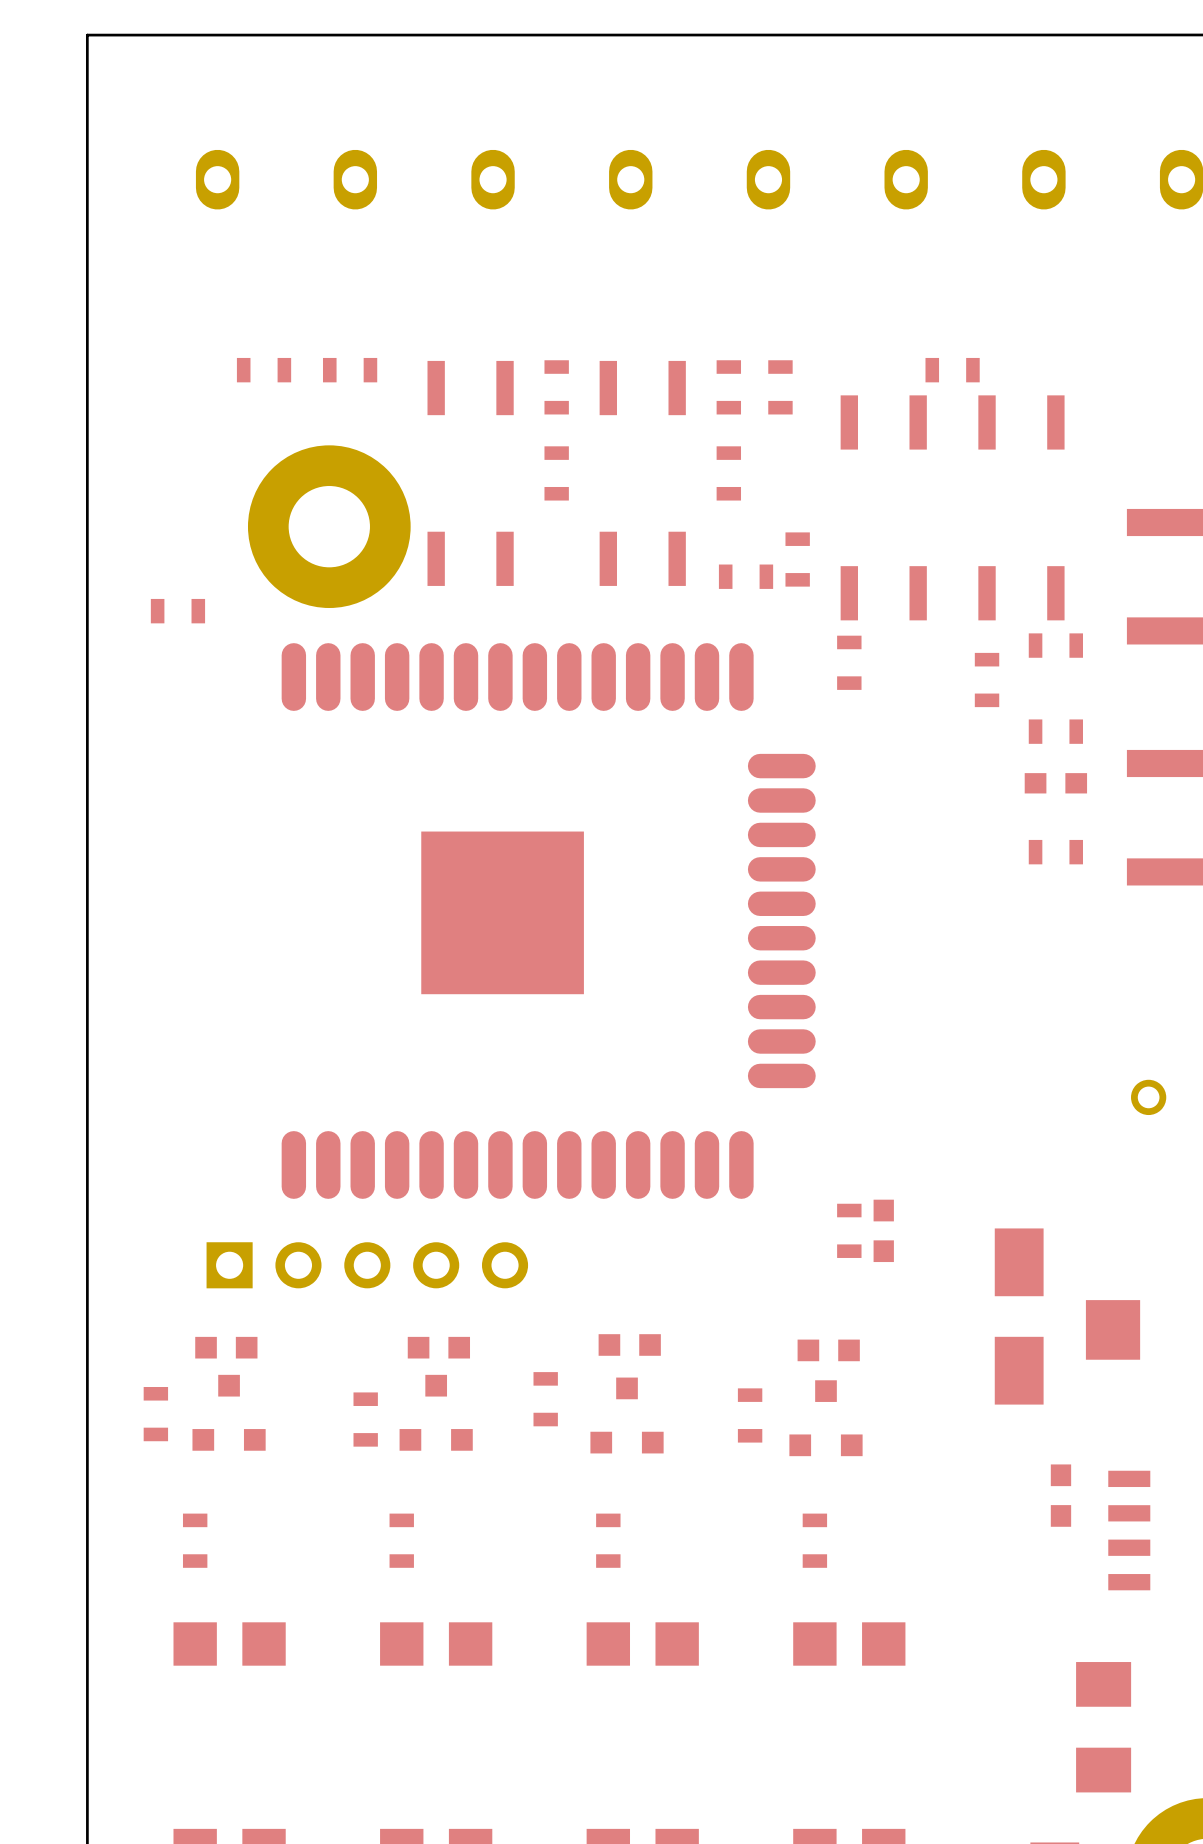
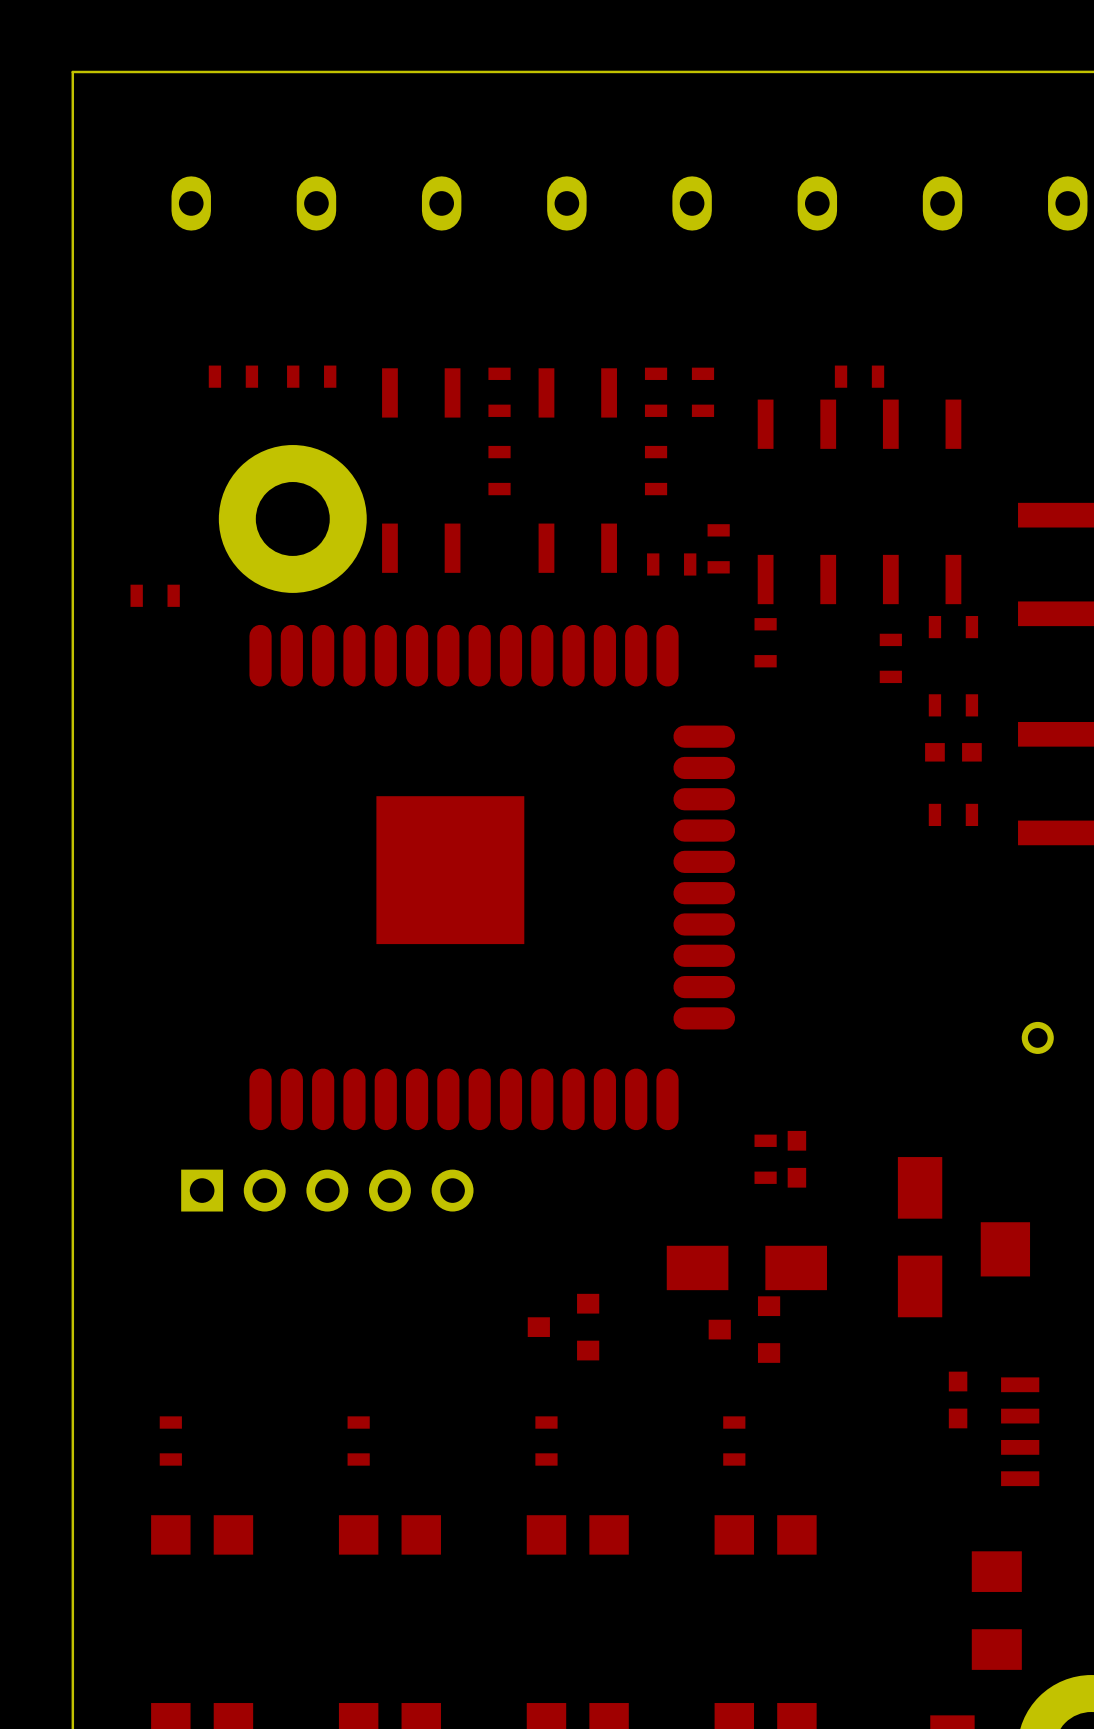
part footprint: [797, 1339, 860, 1362] -> [666, 1245, 827, 1291]
part: (629, 1344) -> none
part: (226, 1347) -> none
part: (438, 1347) -> none
part footprint: [590, 1377, 664, 1454] -> [527, 1293, 600, 1361]
part footprint: [789, 1380, 863, 1457] -> [708, 1296, 781, 1363]
part: (545, 1399) -> none
part: (229, 1412) -> none
part: (436, 1412) -> none
part: (155, 1414) -> none
part: (750, 1415) -> none
part: (365, 1419) -> none

